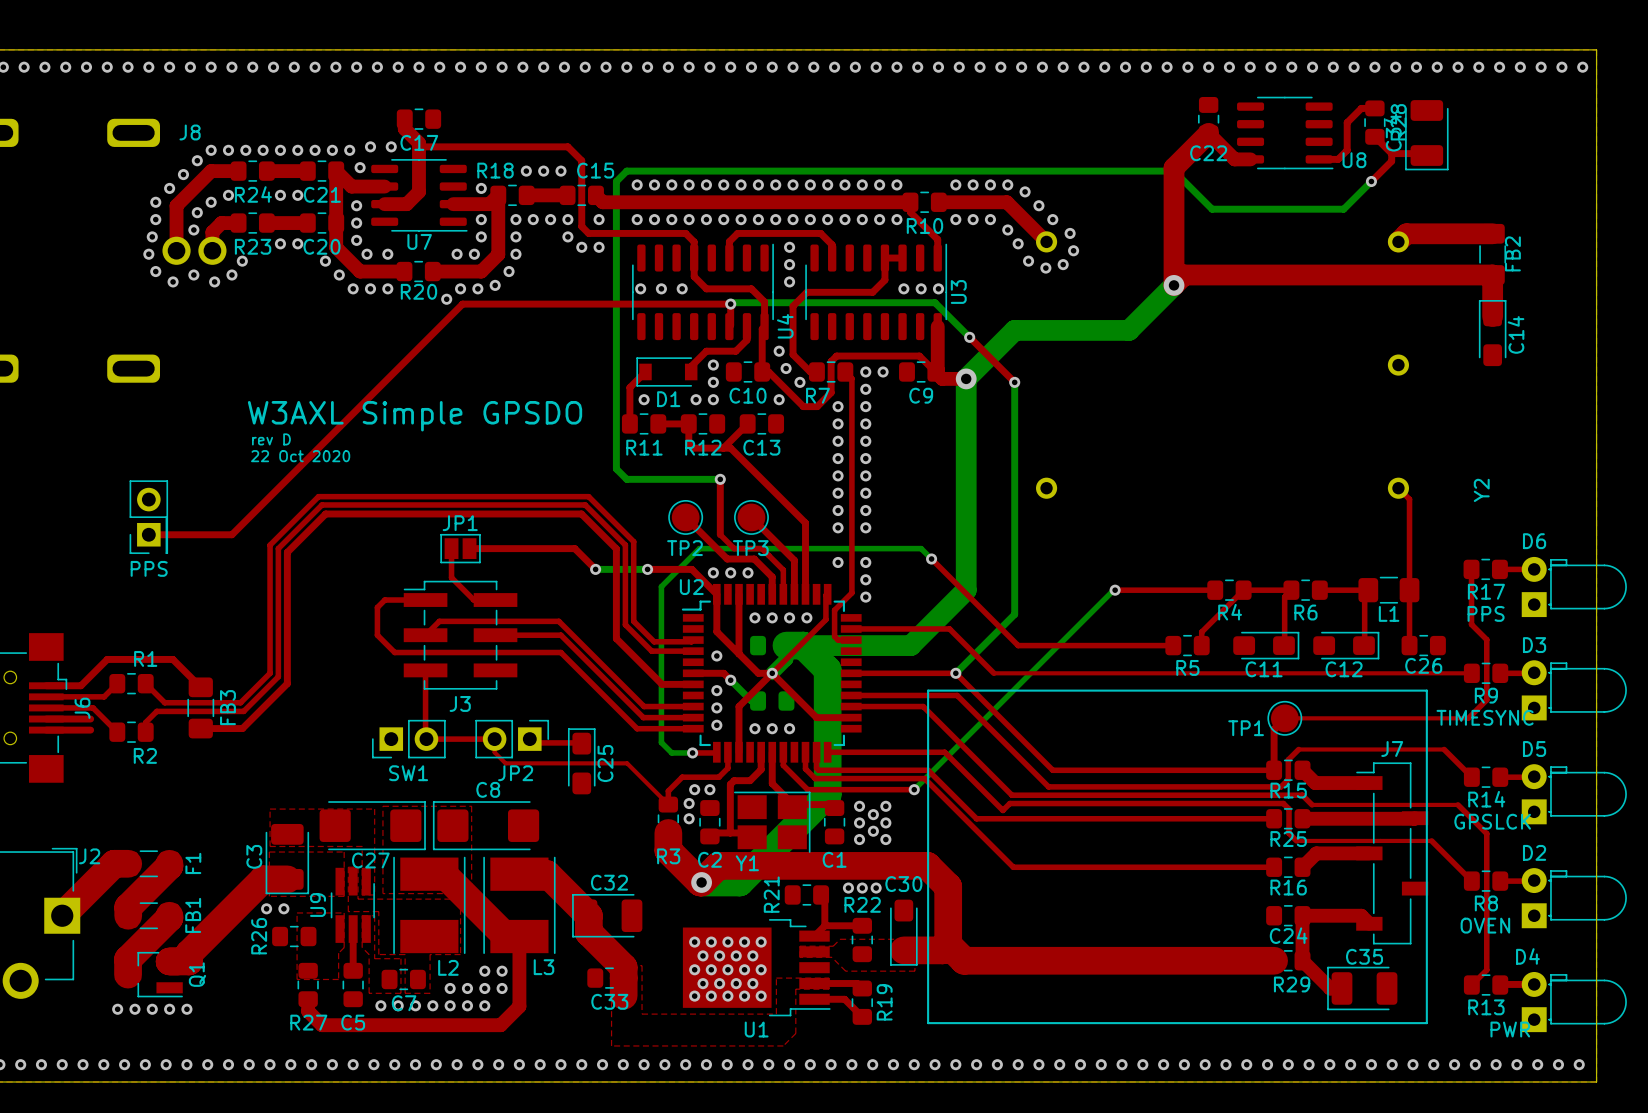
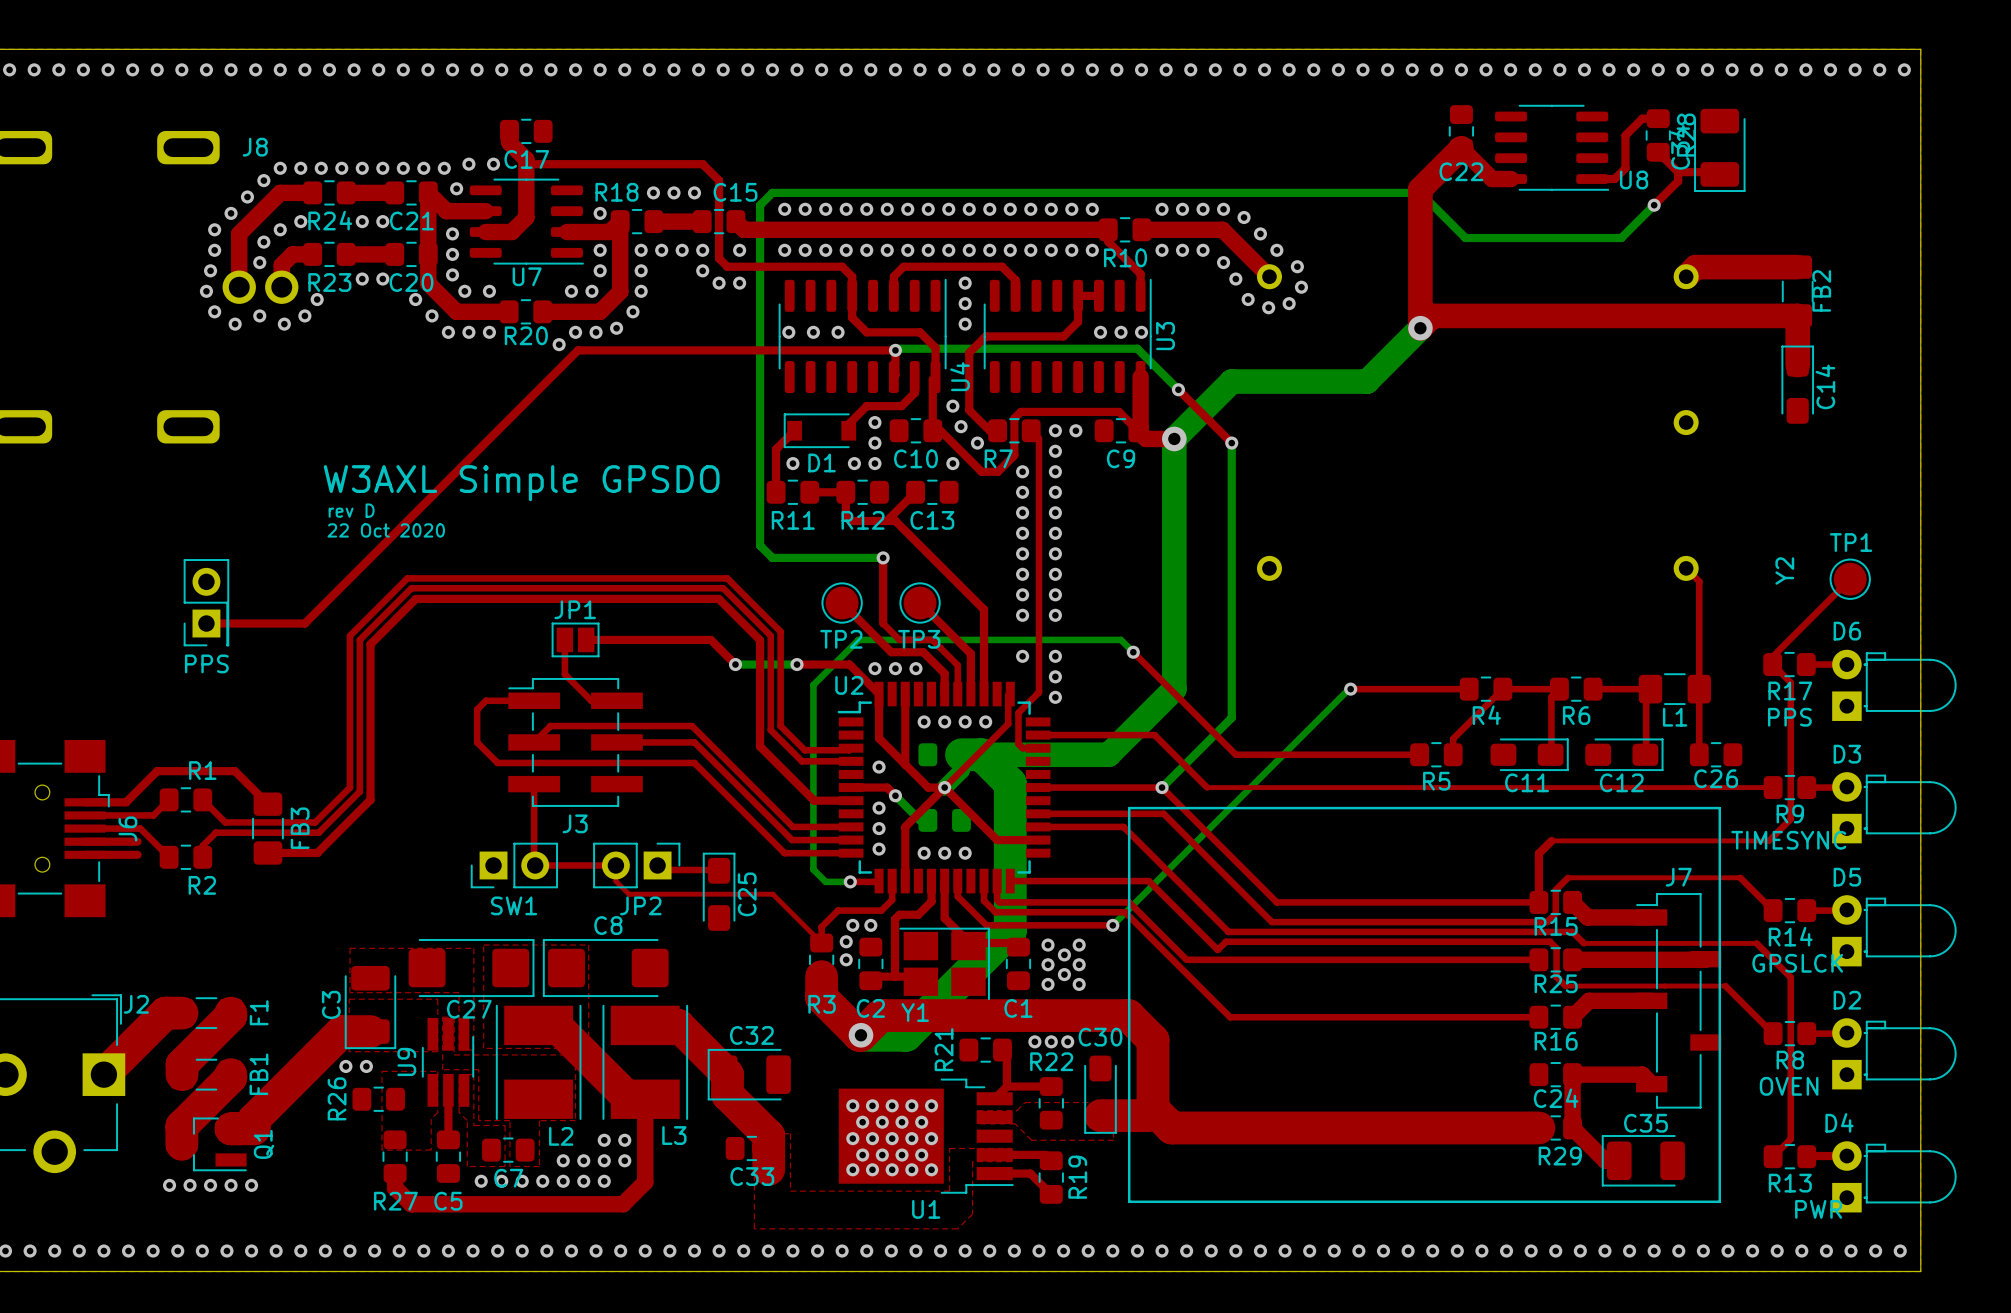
top track: (1471, 569) (1471, 624) (1486, 639) -> (1850, 579) (1772, 656) (1772, 664) (1790, 682) (1790, 747)
TP1 position: (1284, 718) -> (1850, 579)
TP1 name position: TP1 (1246, 728) -> TP1 (1851, 542)

